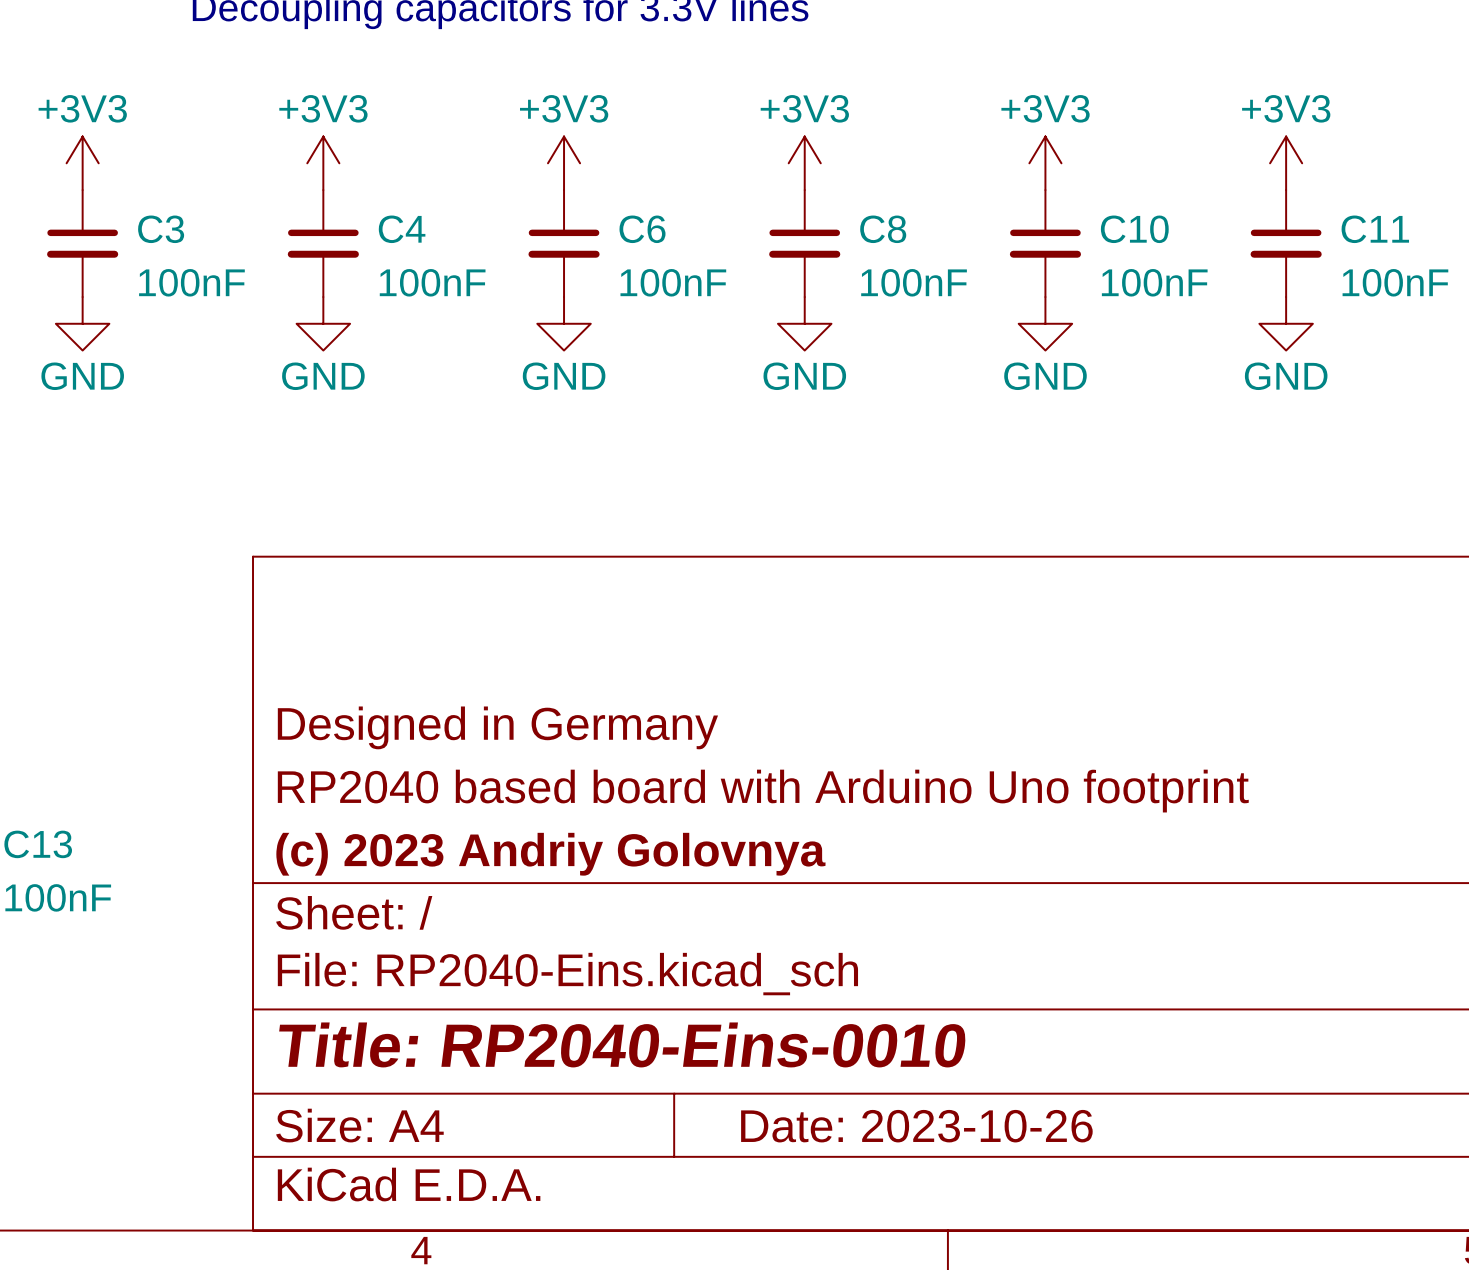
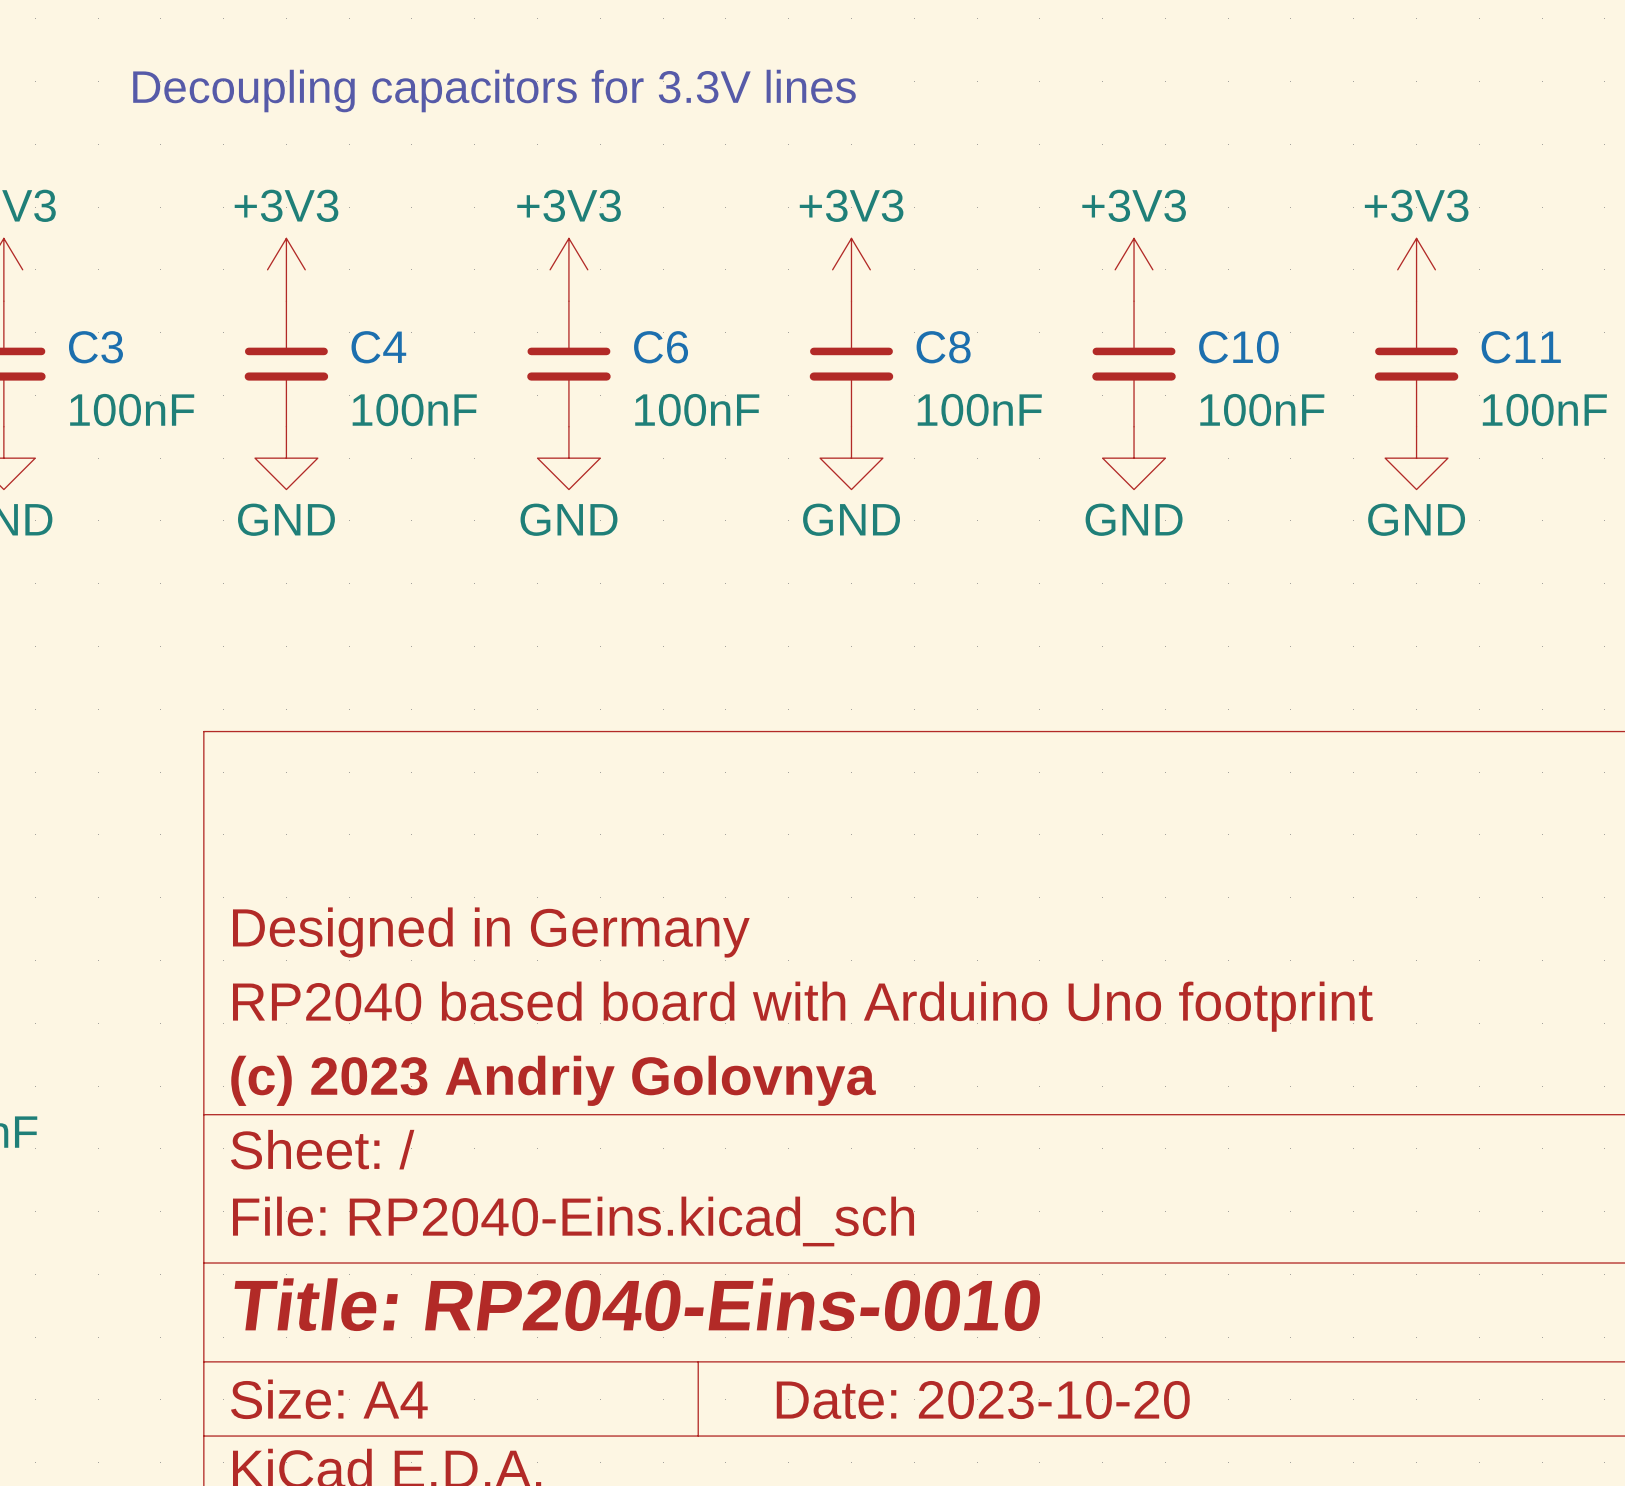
title block: Date: 2023-10-26 (916, 1126) -> Date: 2023-10-20 (983, 1400)

